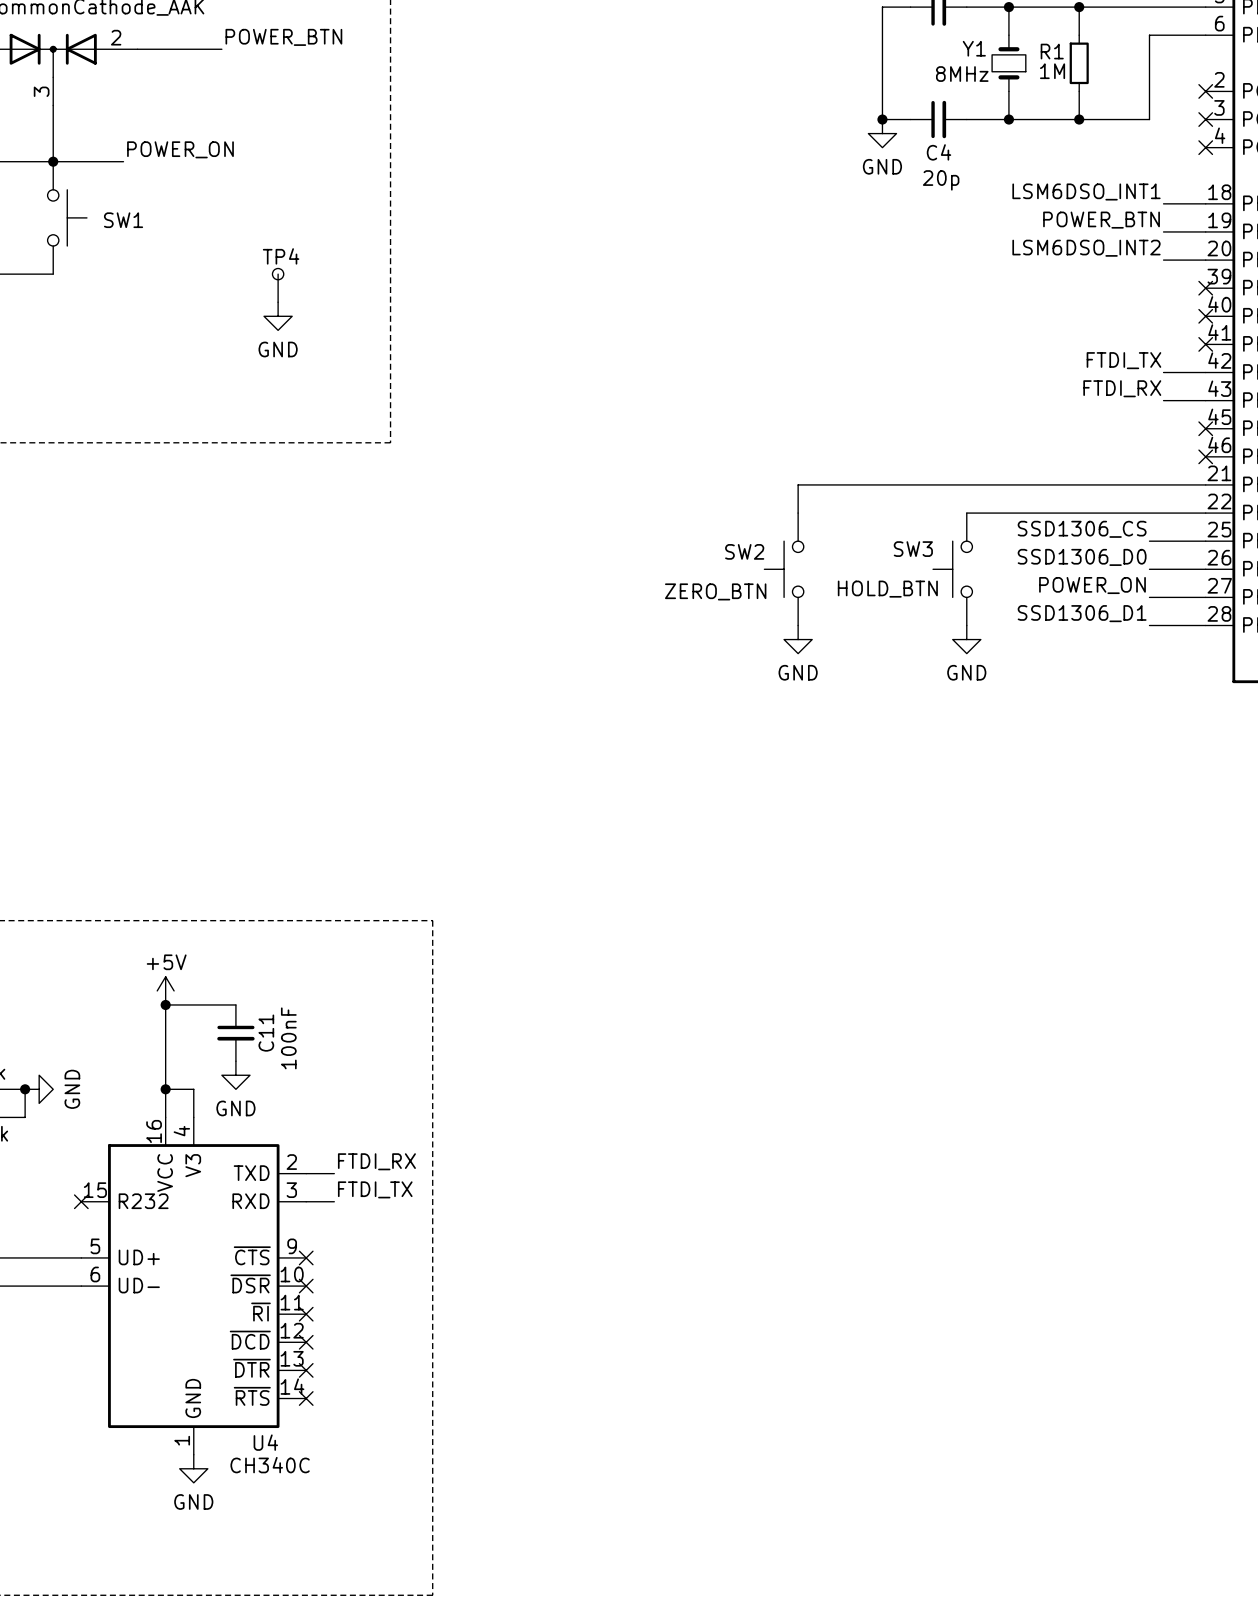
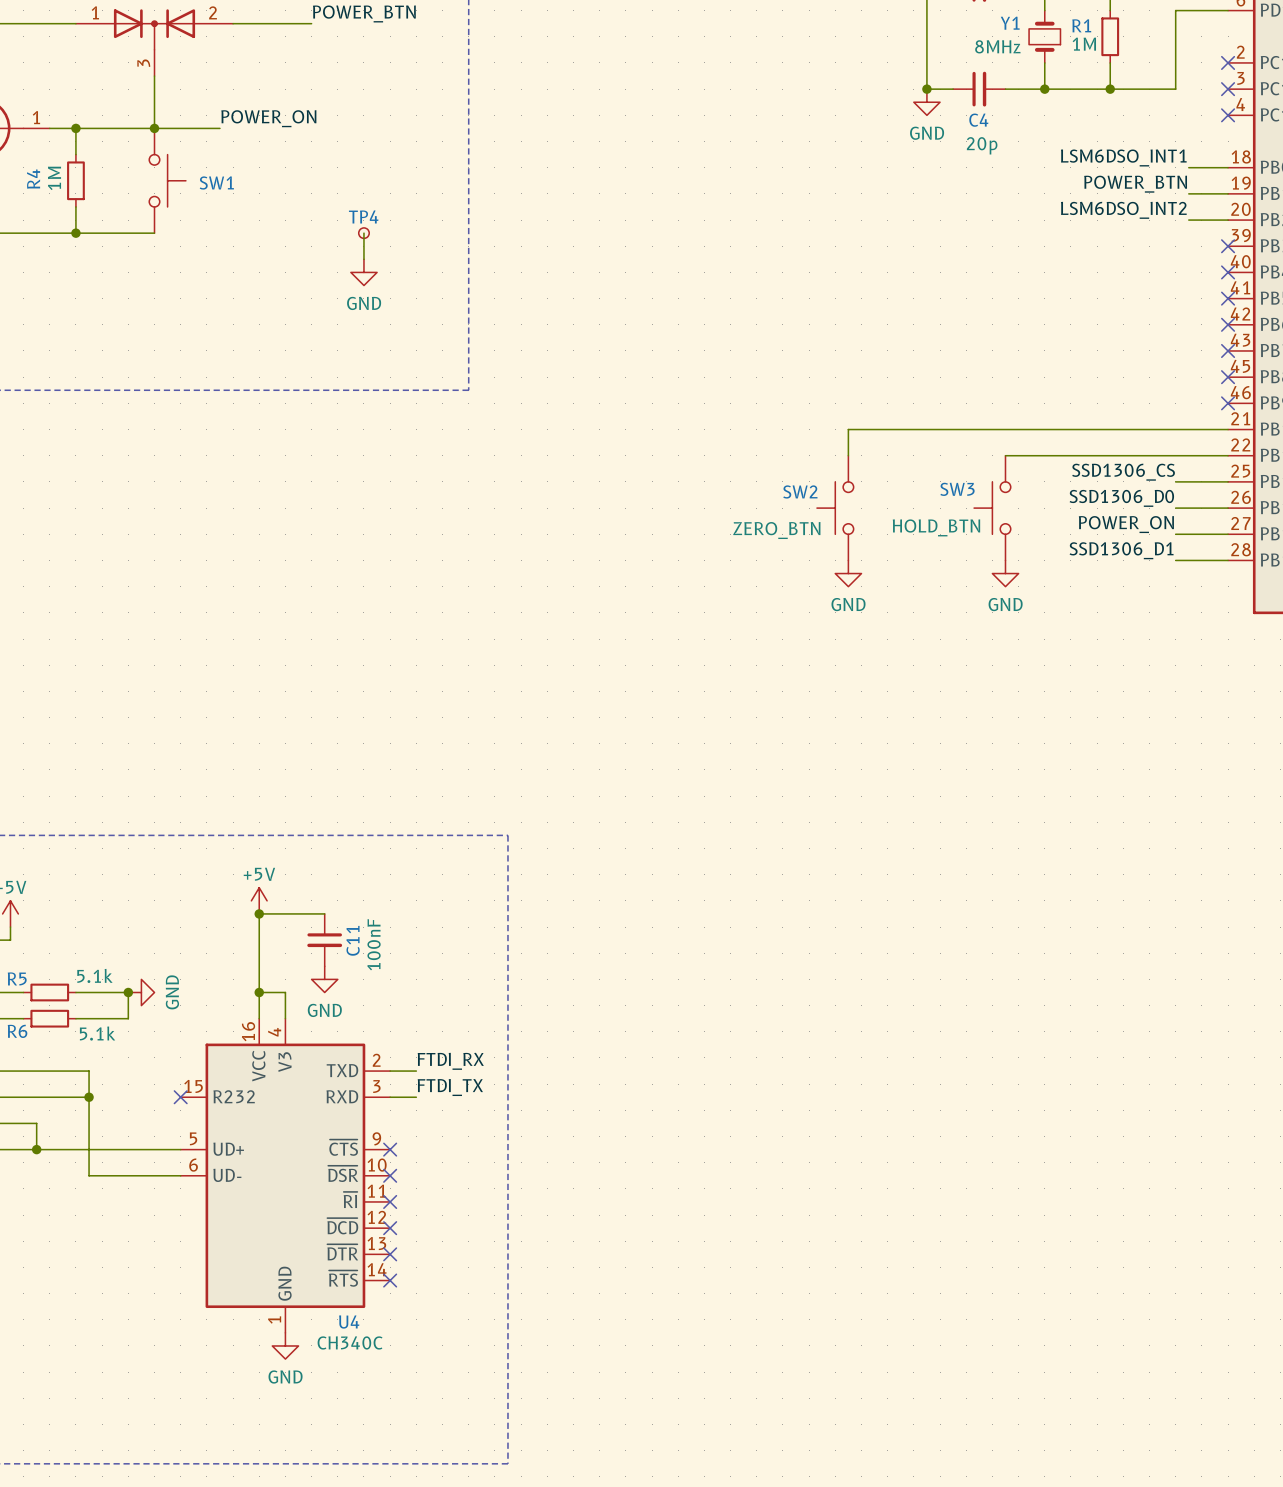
label: FTDI_TX (1123, 360) -> none
wire: (1163, 372) (1205, 372) -> none
no-connect mark: none -> (1228, 324)
label: FTDI_RX (1122, 388) -> none
wire: (1163, 400) (1205, 400) -> none
no-connect mark: none -> (1228, 350)

